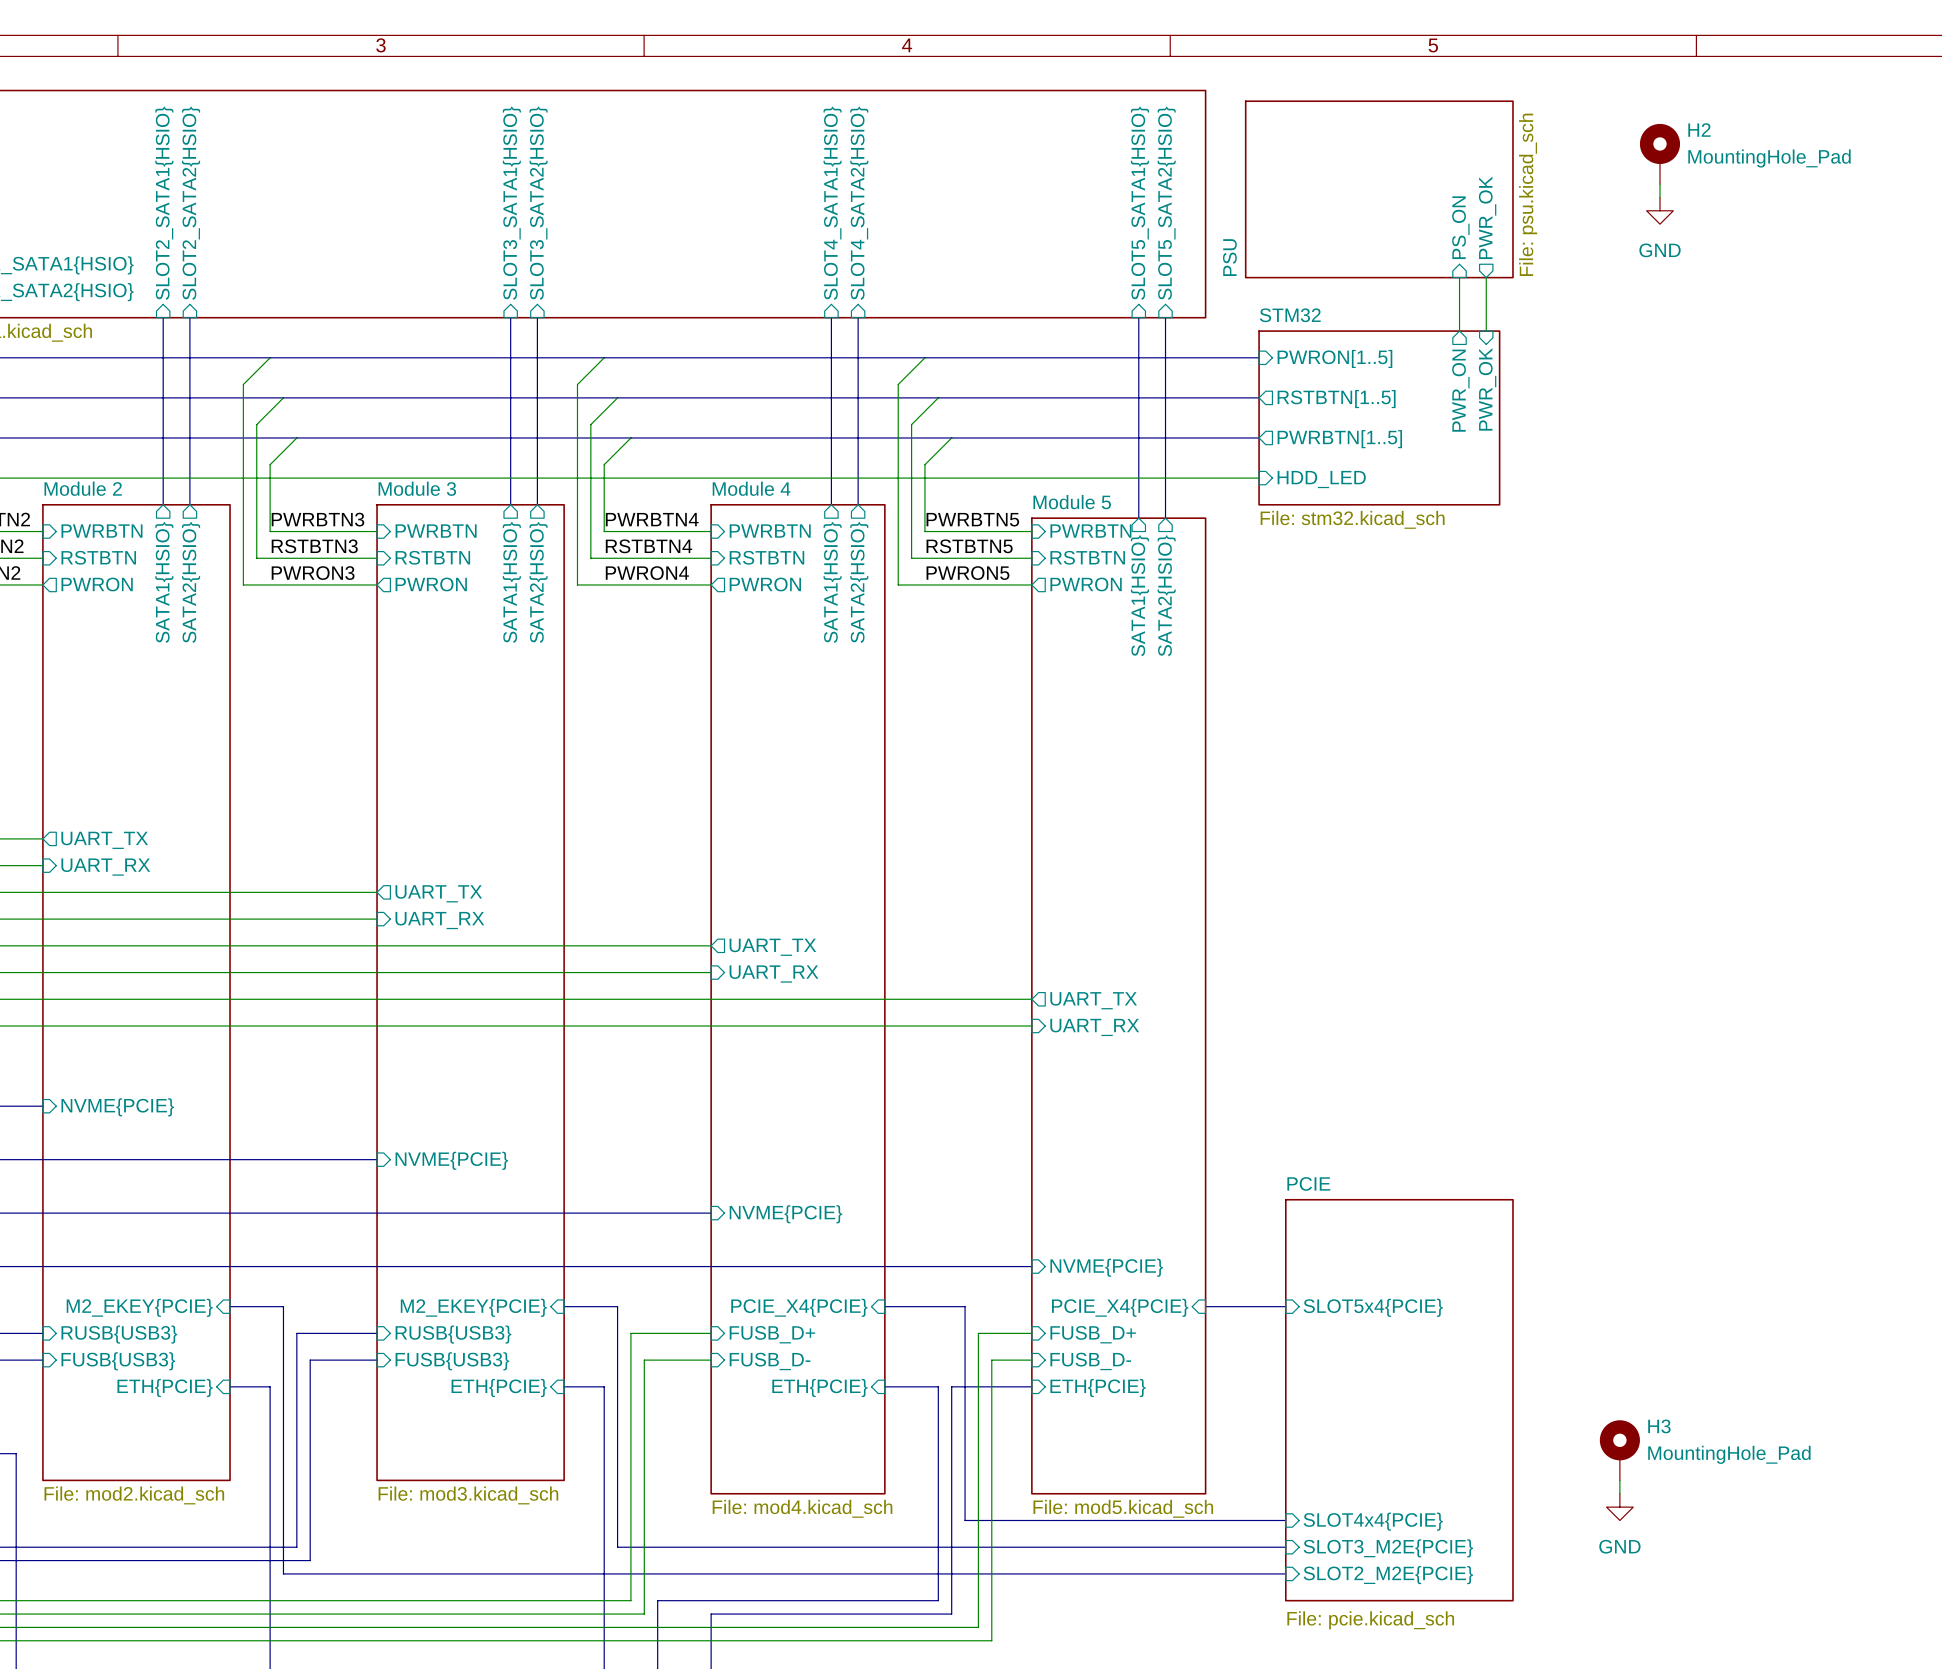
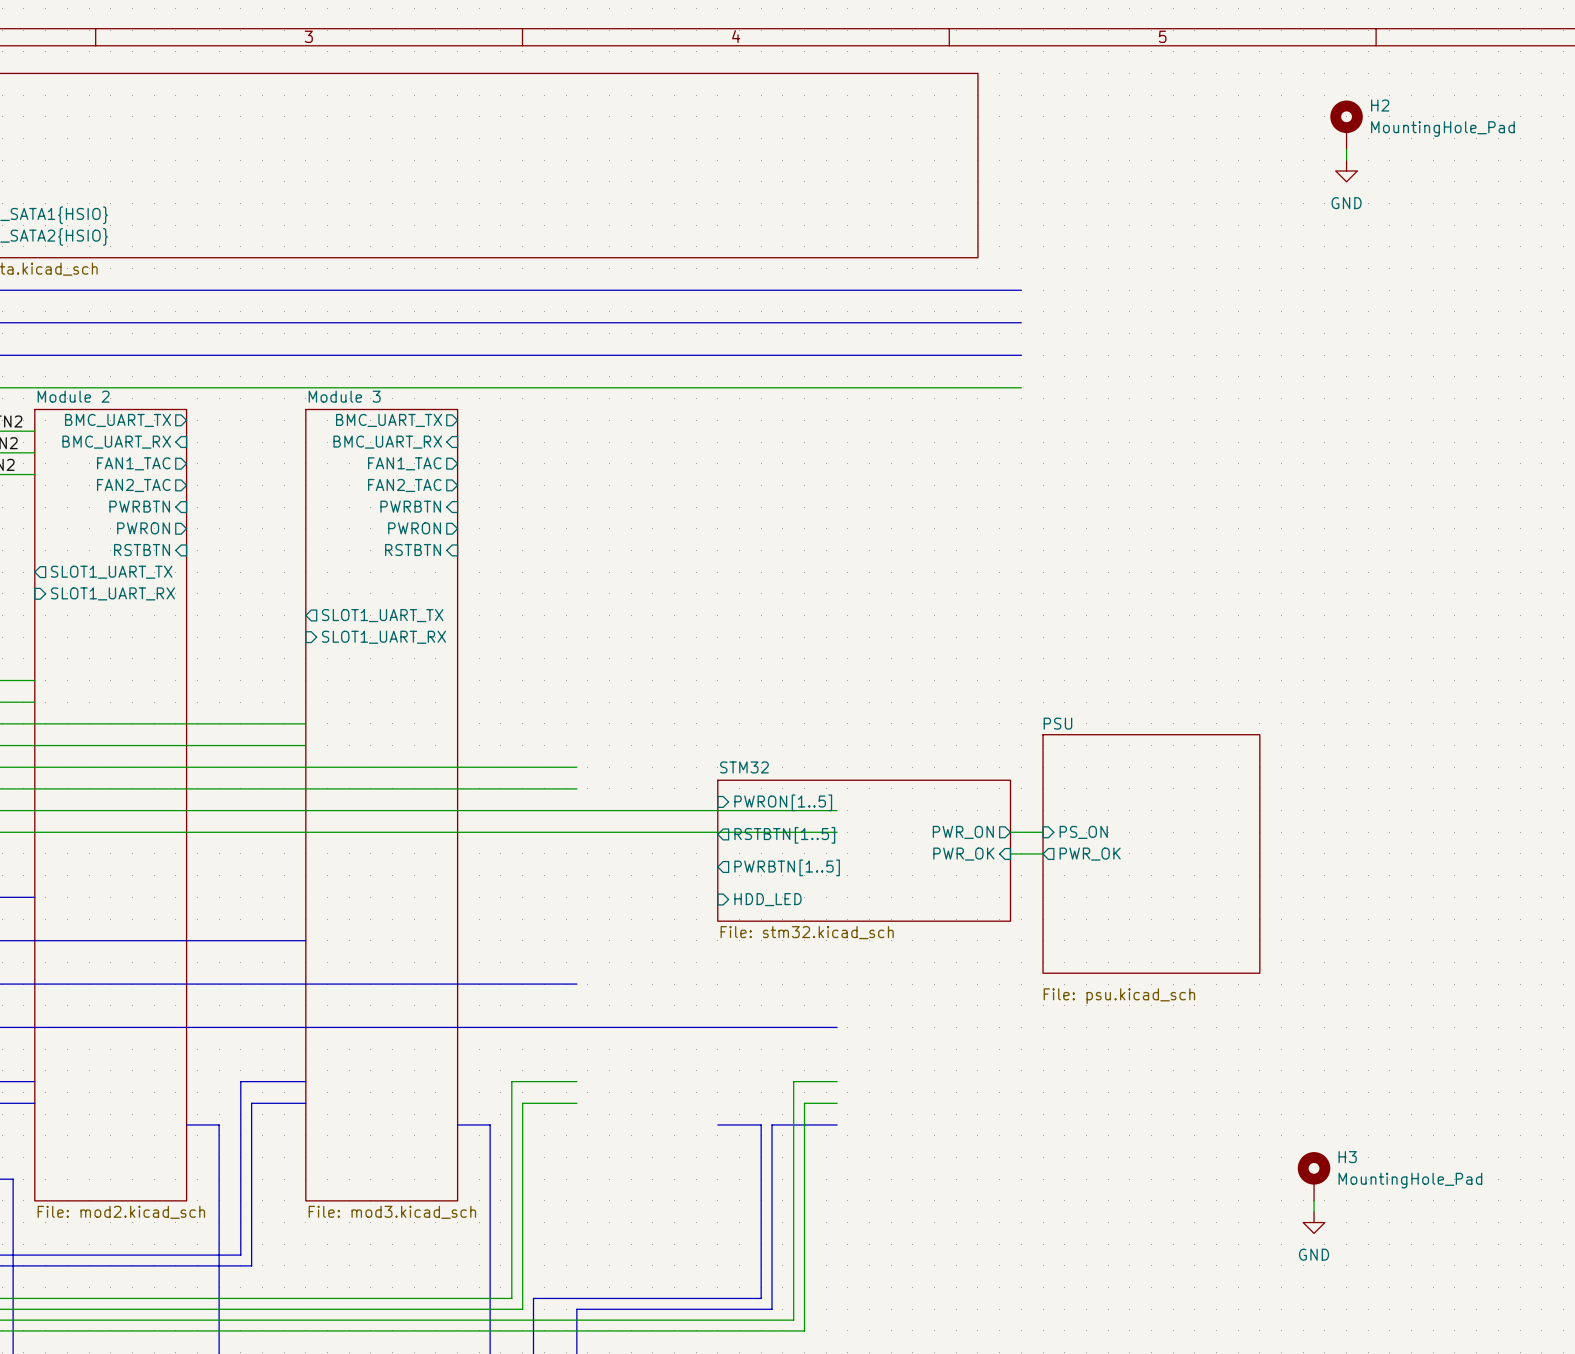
sheet PSU: File: psu.kicad_sch (1379, 189) -> none
sheet pin: SLOT2_SATA1{HSIO} (164, 203) -> none
sheet pin: SLOT2_SATA2{HSIO} (191, 203) -> none
sheet pin: SLOT3_SATA1{HSIO} (511, 203) -> none
sheet pin: SLOT3_SATA2{HSIO} (538, 203) -> none
sheet pin: SLOT4_SATA1{HSIO} (832, 203) -> none
sheet pin: SLOT4_SATA2{HSIO} (859, 203) -> none
sheet pin: SLOT5_SATA1{HSIO} (1139, 203) -> none
sheet pin: SLOT5_SATA2{HSIO} (1166, 203) -> none
sheet pin: PWR_OK (1487, 217) -> none
sheet pin: PS_ON (1460, 227) -> none
wire: (1459, 277) (1459, 331) -> none
wire: (1486, 277) (1486, 331) -> none
sheet STM32 name position: STM32 (1290, 315) -> STM32 (744, 767)
bus: (163, 317) (163, 504) -> none
bus: (189, 317) (189, 504) -> none
bus: (510, 317) (510, 504) -> none
bus: (537, 317) (537, 504) -> none
bus: (831, 317) (831, 504) -> none
bus: (858, 317) (858, 504) -> none
bus: (1138, 317) (1138, 518) -> none
bus: (1165, 317) (1165, 518) -> none
sheet STM32 shape: [1258, 330, 1501, 506] -> [717, 779, 1012, 922]
wire: (270, 357) (243, 384) (243, 584) (377, 584) -> none
wire: (604, 357) (577, 384) (577, 584) (711, 584) -> none
wire: (924, 357) (898, 384) (898, 584) (1031, 584) -> none
sheet pin: PWRON[1..5] (1334, 358) -> none
sheet pin: PWR_OK (1487, 389) -> none
sheet pin: PWR_ON (1460, 390) -> none
wire: (283, 397) (256, 424) (256, 558) (377, 558) -> none
wire: (617, 397) (590, 424) (590, 558) (711, 558) -> none
wire: (938, 397) (911, 424) (911, 558) (1031, 558) -> none
sheet pin: RSTBTN[1..5] (1336, 399) -> none
wire: (296, 437) (270, 464) (270, 531) (377, 531) -> none
wire: (630, 437) (604, 464) (604, 531) (711, 531) -> none
wire: (951, 437) (924, 464) (924, 531) (1031, 531) -> none
sheet pin: PWRBTN[1..5] (1339, 439) -> none
sheet pin: HDD_LED (1321, 479) -> none
sheet pin: none -> BMC_UART_TX (118, 420)
label: PWRBTN3 (317, 519) -> none
label: PWRBTN4 (652, 519) -> none
label: PWRBTN5 (972, 519) -> none
sheet STM32 value position: File: stm32.kicad_sch (1352, 519) -> File: stm32.kicad_sch (807, 932)
sheet pin: PWRBTN (101, 531) -> none
sheet pin: PWRBTN (436, 531) -> none
sheet pin: PWRBTN (770, 531) -> none
sheet pin: PWRBTN (1090, 531) -> none
sheet pin: none -> BMC_UART_RX (116, 442)
label: RSTBTN3 (314, 546) -> none
sheet pin: none -> BMC_UART_RX (387, 442)
label: RSTBTN4 (648, 546) -> none
label: RSTBTN5 (969, 546) -> none
sheet pin: RSTBTN (98, 557) -> none
sheet pin: RSTBTN (432, 557) -> none
sheet pin: RSTBTN (766, 557) -> none
sheet pin: RSTBTN (1087, 557) -> none
sheet pin: none -> FAN1_TAC (133, 463)
sheet pin: none -> FAN1_TAC (404, 463)
label: PWRON3 (313, 573) -> none
label: PWRON4 (647, 573) -> none
label: PWRON5 (967, 573) -> none
sheet pin: SATA1{HSIO} (164, 582) -> none
sheet pin: SATA2{HSIO} (191, 582) -> none
sheet pin: SATA1{HSIO} (511, 582) -> none
sheet pin: SATA2{HSIO} (538, 582) -> BMC_UART_TX (389, 420)
sheet pin: SATA1{HSIO} (832, 582) -> none
sheet pin: SATA2{HSIO} (859, 582) -> none
sheet pin: PWRON (97, 584) -> none
sheet pin: PWRON (431, 584) -> none
sheet pin: PWRON (765, 584) -> none
sheet pin: PWRON (1086, 584) -> none
sheet pin: SATA1{HSIO} (1139, 595) -> none
sheet pin: SATA2{HSIO} (1166, 595) -> none
sheet pin: none -> FAN2_TAC (133, 485)
sheet pin: none -> FAN2_TAC (404, 485)
sheet pin: none -> PWRBTN (139, 506)
sheet pin: none -> PWRBTN (410, 506)
sheet pin: none -> PWRON (143, 528)
sheet pin: none -> PWRON (414, 528)
sheet pin: none -> RSTBTN (142, 550)
sheet pin: none -> RSTBTN (413, 550)
sheet pin: none -> SLOT1_UART_TX (111, 572)
sheet pin: none -> SLOT1_UART_RX (112, 593)
sheet pin: none -> SLOT1_UART_TX (382, 615)
sheet pin: none -> SLOT1_UART_RX (383, 637)
sheet pin: UART_TX (104, 840) -> none
sheet pin: UART_RX (105, 867) -> none
sheet pin: UART_TX (438, 893) -> none
sheet pin: UART_RX (439, 920) -> none
sheet pin: UART_TX (772, 947) -> none
sheet pin: UART_RX (773, 973) -> none
sheet pin: none -> PWRON[1..5] (783, 802)
sheet Module 4: File: mod4.kicad_sch (797, 999) -> none
sheet pin: UART_TX (1093, 1000) -> none
sheet Module 5: File: mod5.kicad_sch (1118, 1005) -> none
wire: none -> (1010, 832) (1043, 832)
sheet pin: UART_RX (1094, 1027) -> none
sheet pin: none -> PWR_ON (963, 832)
sheet pin: none -> PS_ON (1083, 832)
sheet pin: none -> RSTBTN[1..5] (784, 835)
wire: none -> (1010, 853) (1043, 853)
sheet PSU: none -> File: psu.kicad_sch (1151, 853)
sheet pin: none -> PWR_OK (963, 854)
sheet pin: none -> PWR_OK (1090, 854)
sheet pin: none -> PWRBTN[1..5] (787, 867)
sheet pin: NVME{PCIE} (117, 1107) -> none
sheet pin: none -> HDD_LED (768, 899)
sheet pin: NVME{PCIE} (451, 1160) -> none
sheet pin: NVME{PCIE} (785, 1214) -> none
sheet pin: NVME{PCIE} (1106, 1267) -> none
bus: (230, 1306) (283, 1306) (283, 1573) (1285, 1573) -> none
bus: (564, 1306) (617, 1306) (617, 1547) (1285, 1547) -> none
bus: (884, 1306) (965, 1306) (965, 1520) (1285, 1520) -> none
bus: (1205, 1306) (1285, 1306) -> none
sheet pin: M2_EKEY{PCIE} (139, 1307) -> none
sheet pin: M2_EKEY{PCIE} (473, 1307) -> none
sheet pin: PCIE_X4{PCIE} (799, 1307) -> none
sheet pin: PCIE_X4{PCIE} (1120, 1307) -> none
sheet pin: SLOT5x4{PCIE} (1373, 1307) -> none
sheet pin: RUSB{USB3} (119, 1334) -> none
sheet pin: RUSB{USB3} (453, 1334) -> none
sheet pin: FUSB_D+ (772, 1334) -> none
sheet pin: FUSB_D+ (1093, 1334) -> none
sheet pin: FUSB{USB3} (118, 1361) -> none
sheet pin: FUSB{USB3} (452, 1361) -> none
sheet pin: FUSB_D- (770, 1361) -> none
sheet pin: FUSB_D- (1090, 1361) -> none
sheet pin: ETH{PCIE} (165, 1388) -> none
sheet pin: ETH{PCIE} (499, 1388) -> none
sheet pin: ETH{PCIE} (819, 1388) -> none
sheet pin: ETH{PCIE} (1098, 1388) -> none
sheet PCIE: File: pcie.kicad_sch (1399, 1400) -> none
sheet pin: SLOT4x4{PCIE} (1373, 1521) -> none
sheet pin: SLOT3_M2E{PCIE} (1388, 1548) -> none
sheet pin: SLOT2_M2E{PCIE} (1388, 1575) -> none

